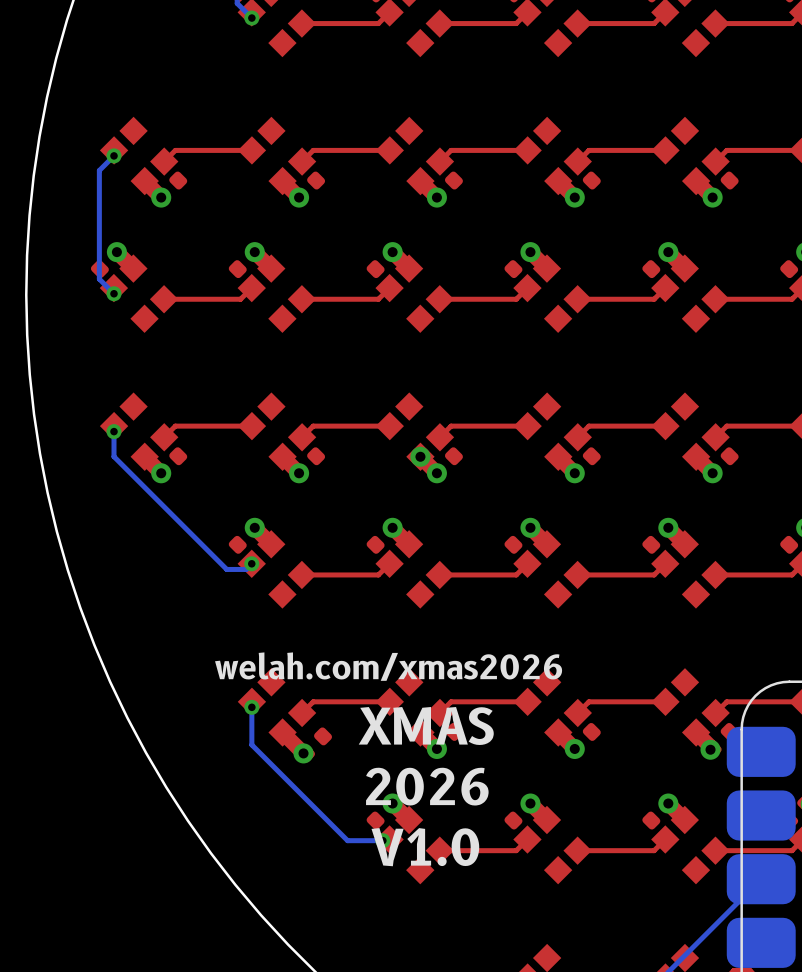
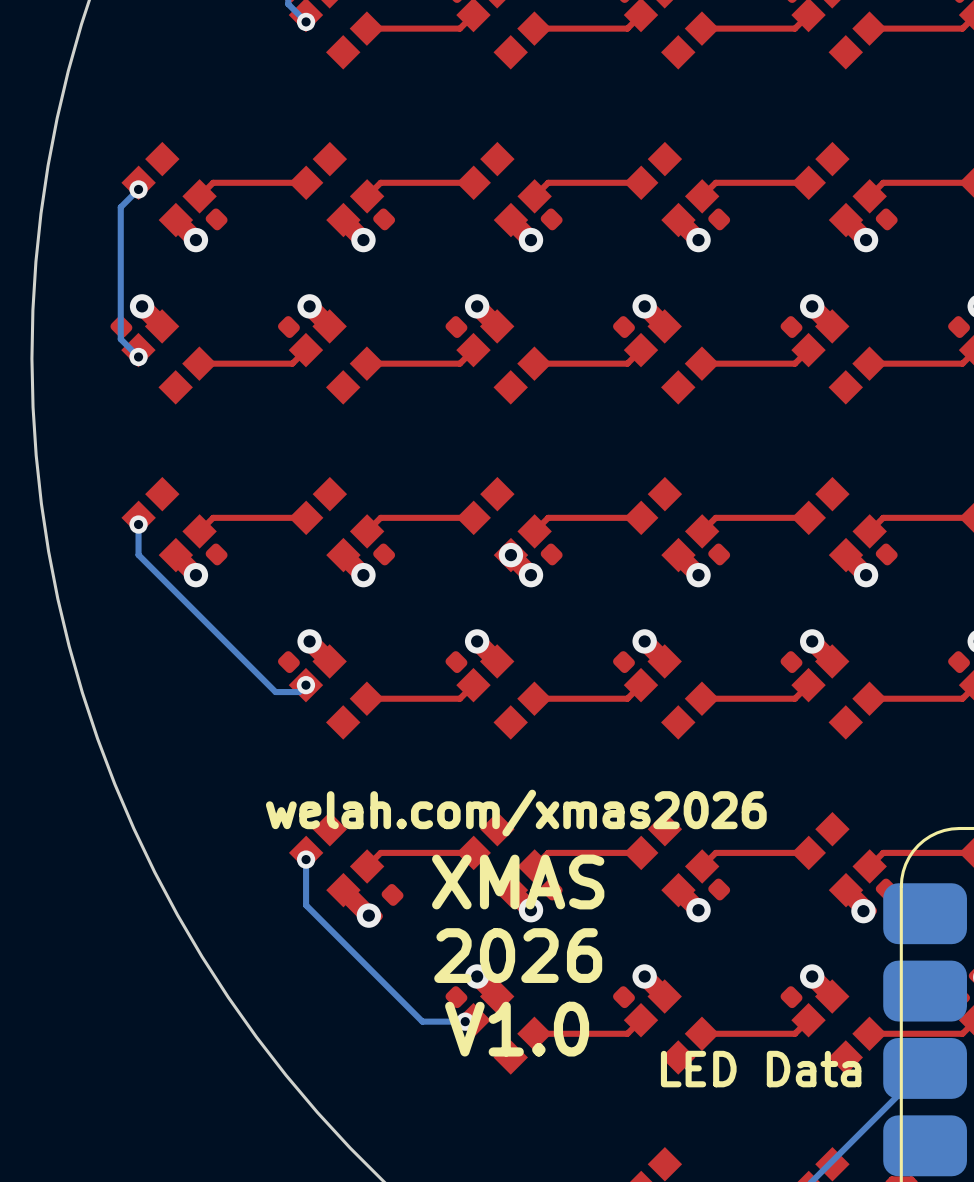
text: none -> LED Data (761, 1069)

